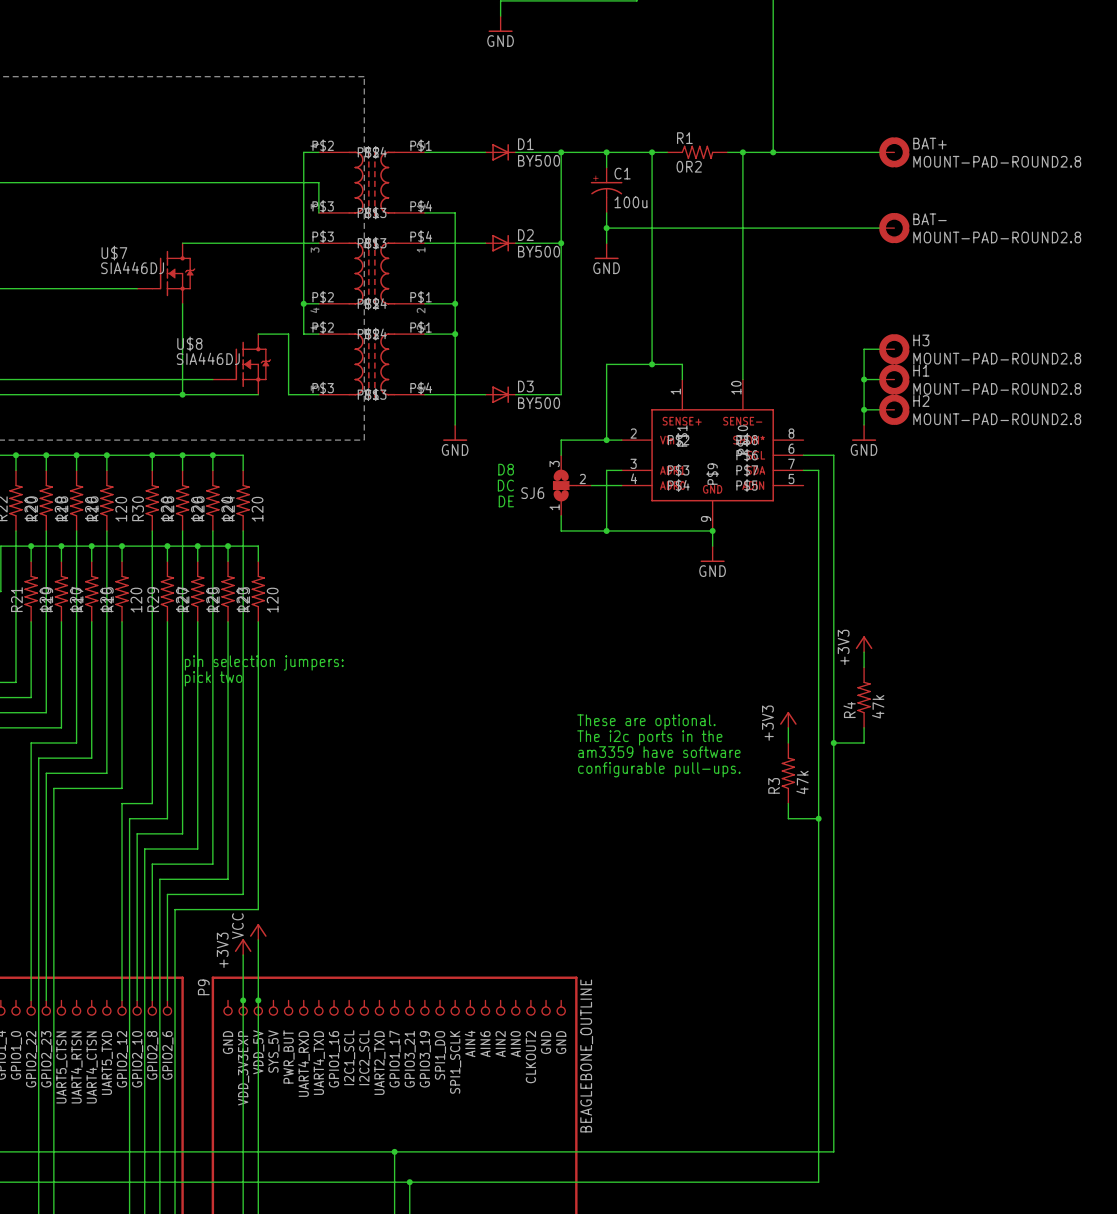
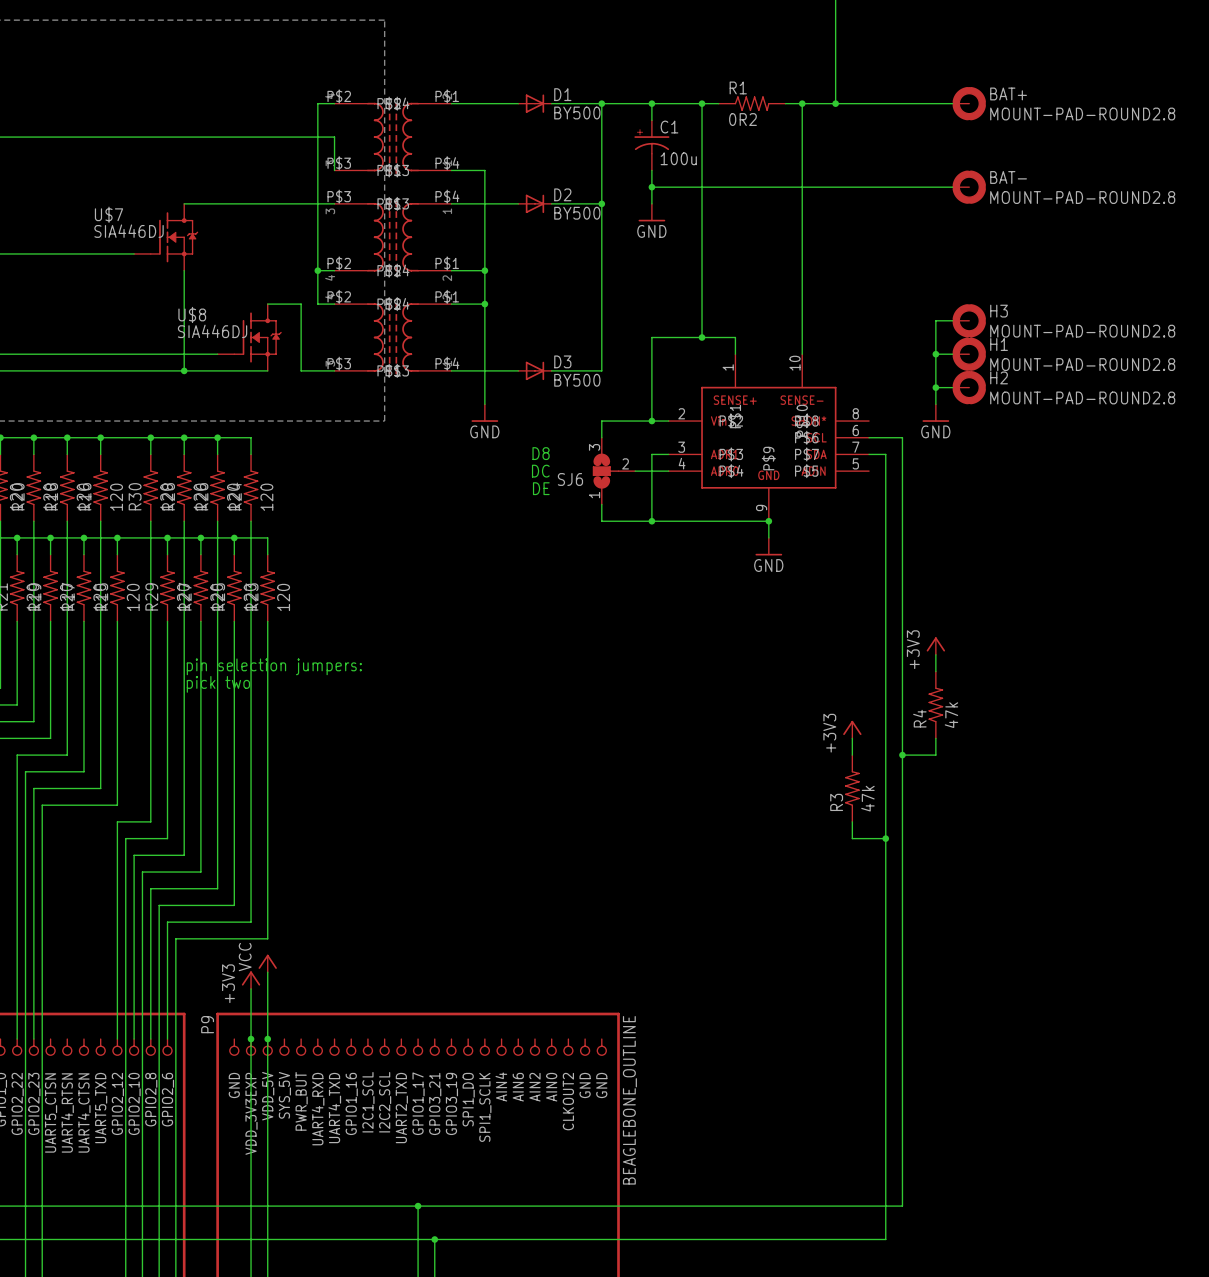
text: These are optional. (646, 722) -> none
text: The i2c ports in the (649, 737) -> none
text: am3359 have software (659, 752) -> none
text: configurable pull-ups. (659, 769) -> none

